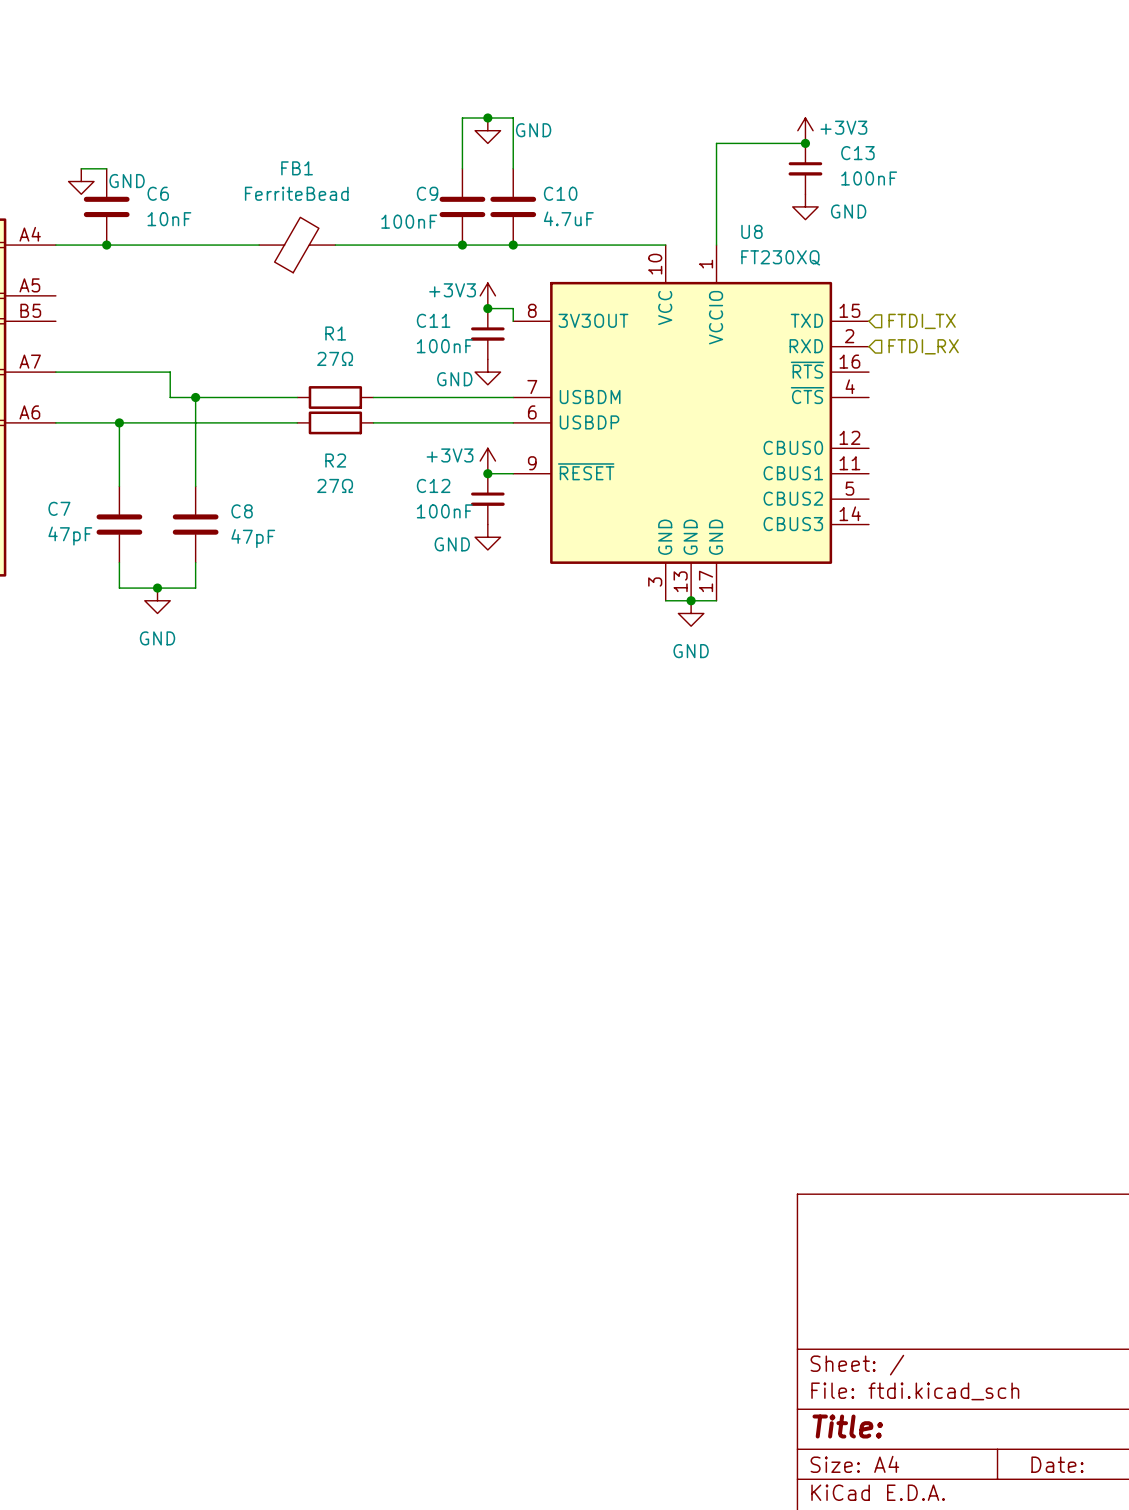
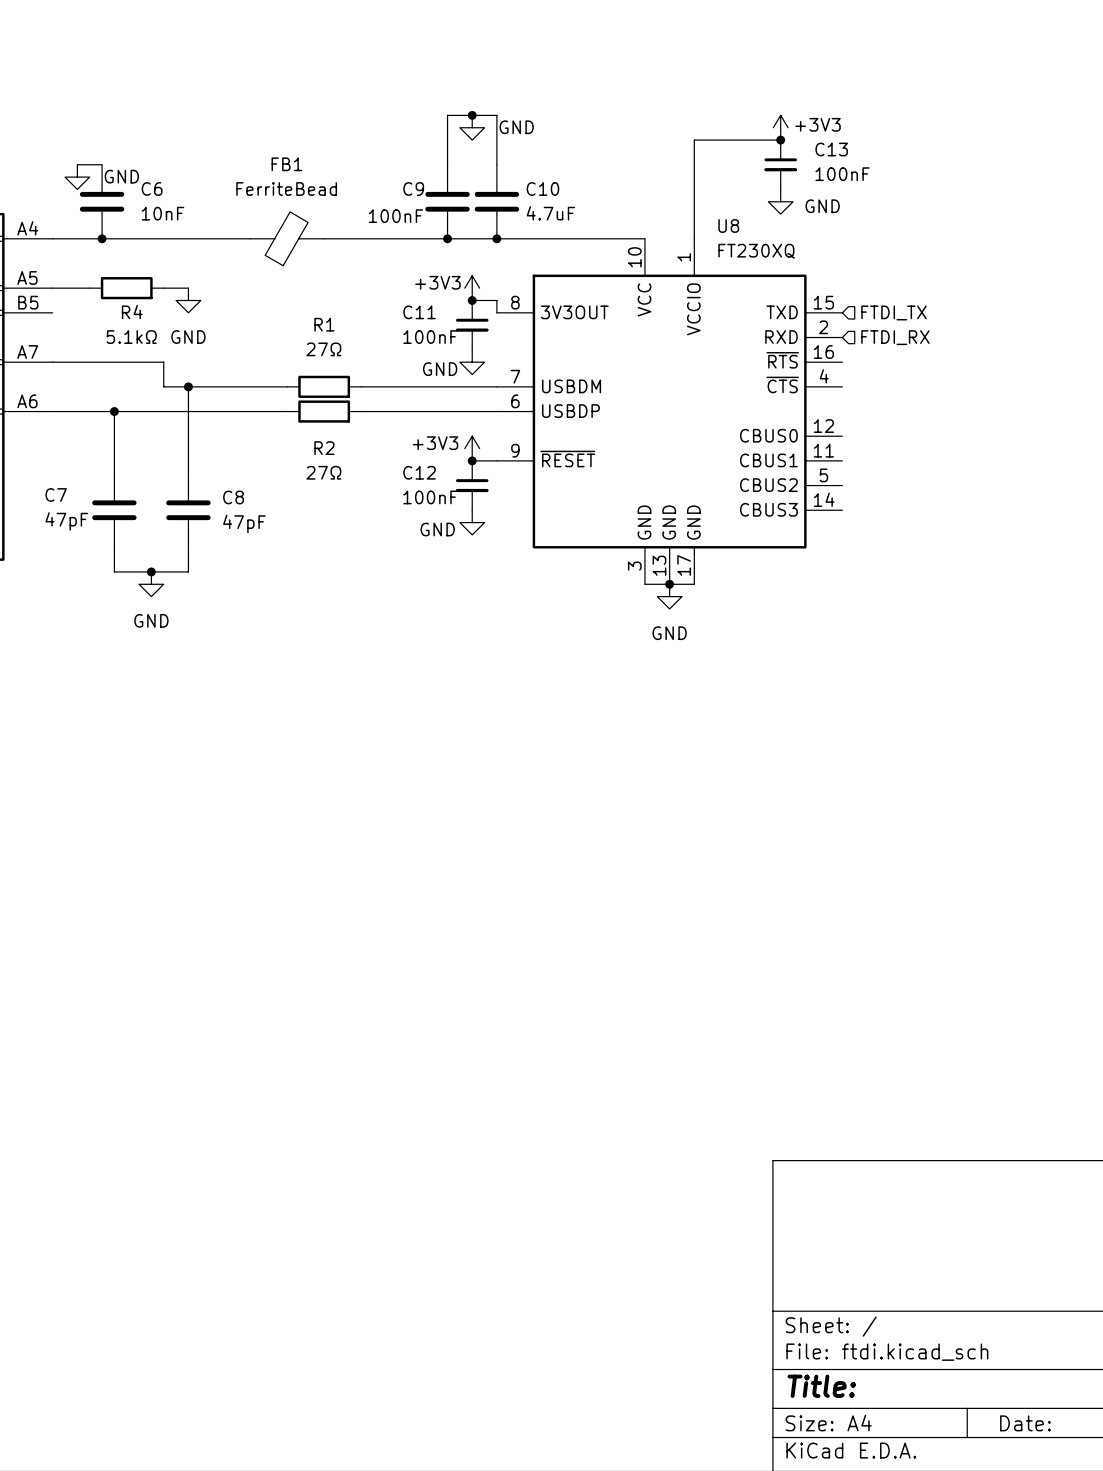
wire: none -> (52, 288) (89, 288)
R4: none -> 5.1kΩ (126, 288)
wire: none -> (163, 288) (188, 288)
power symbol: none -> GND (188, 300)

